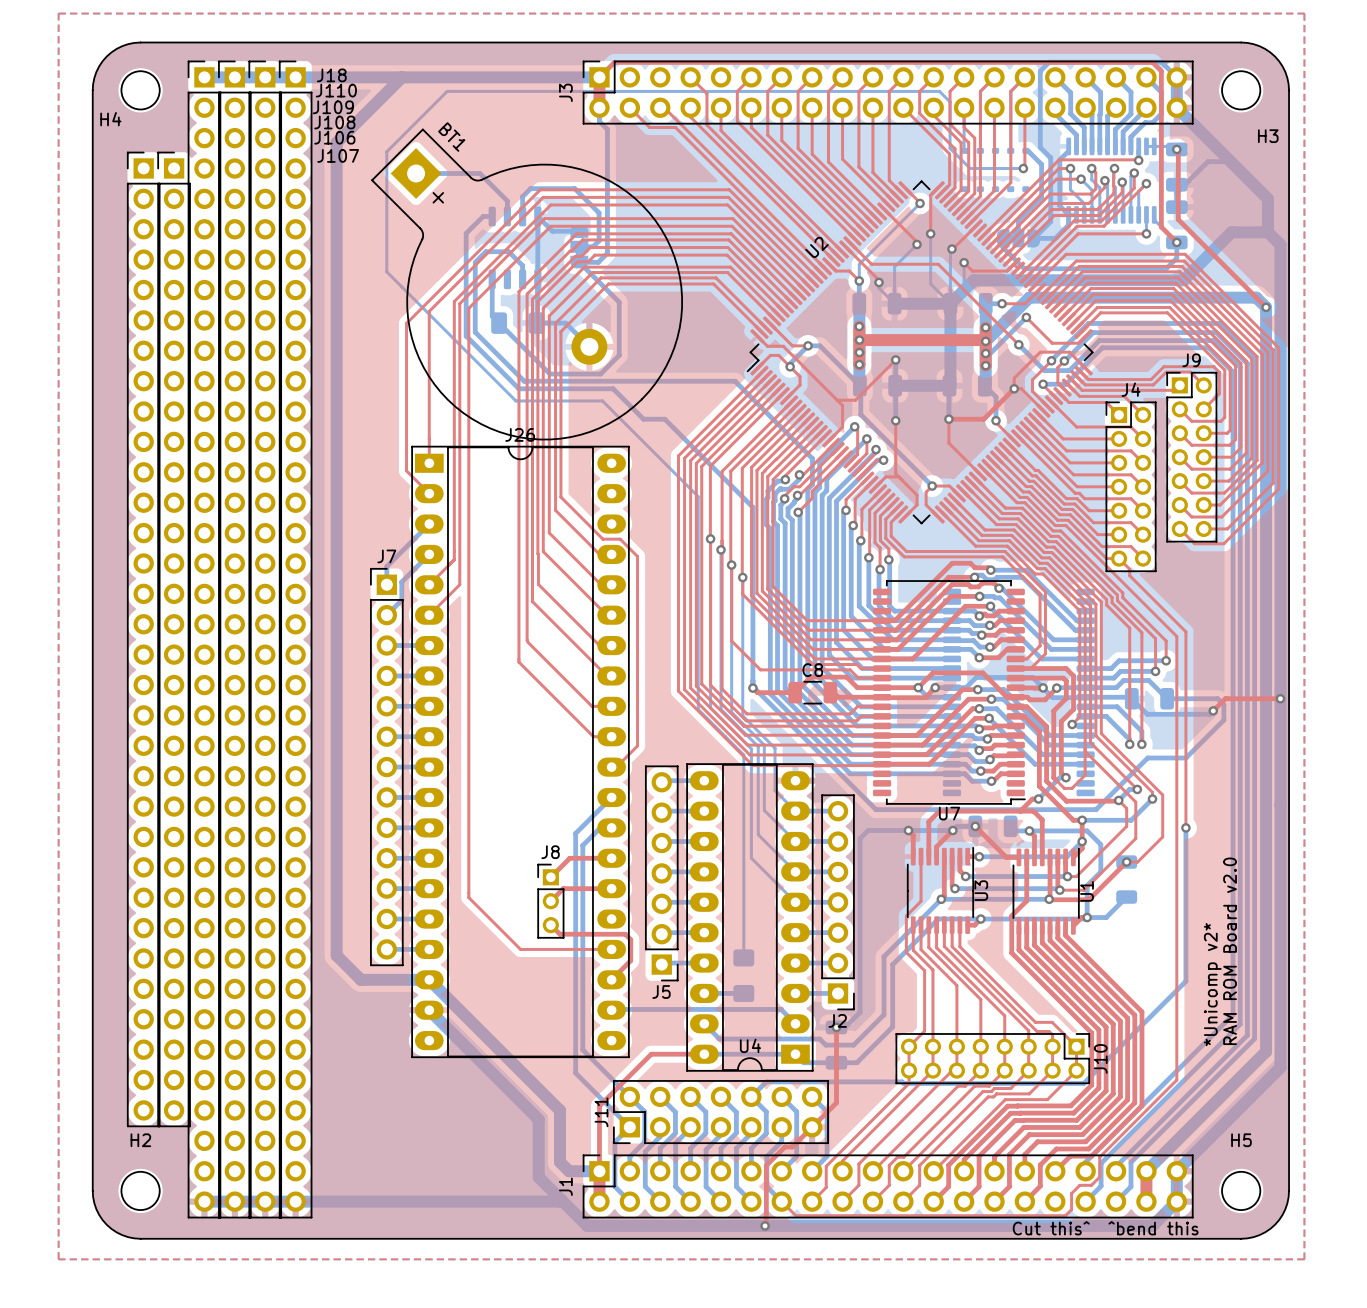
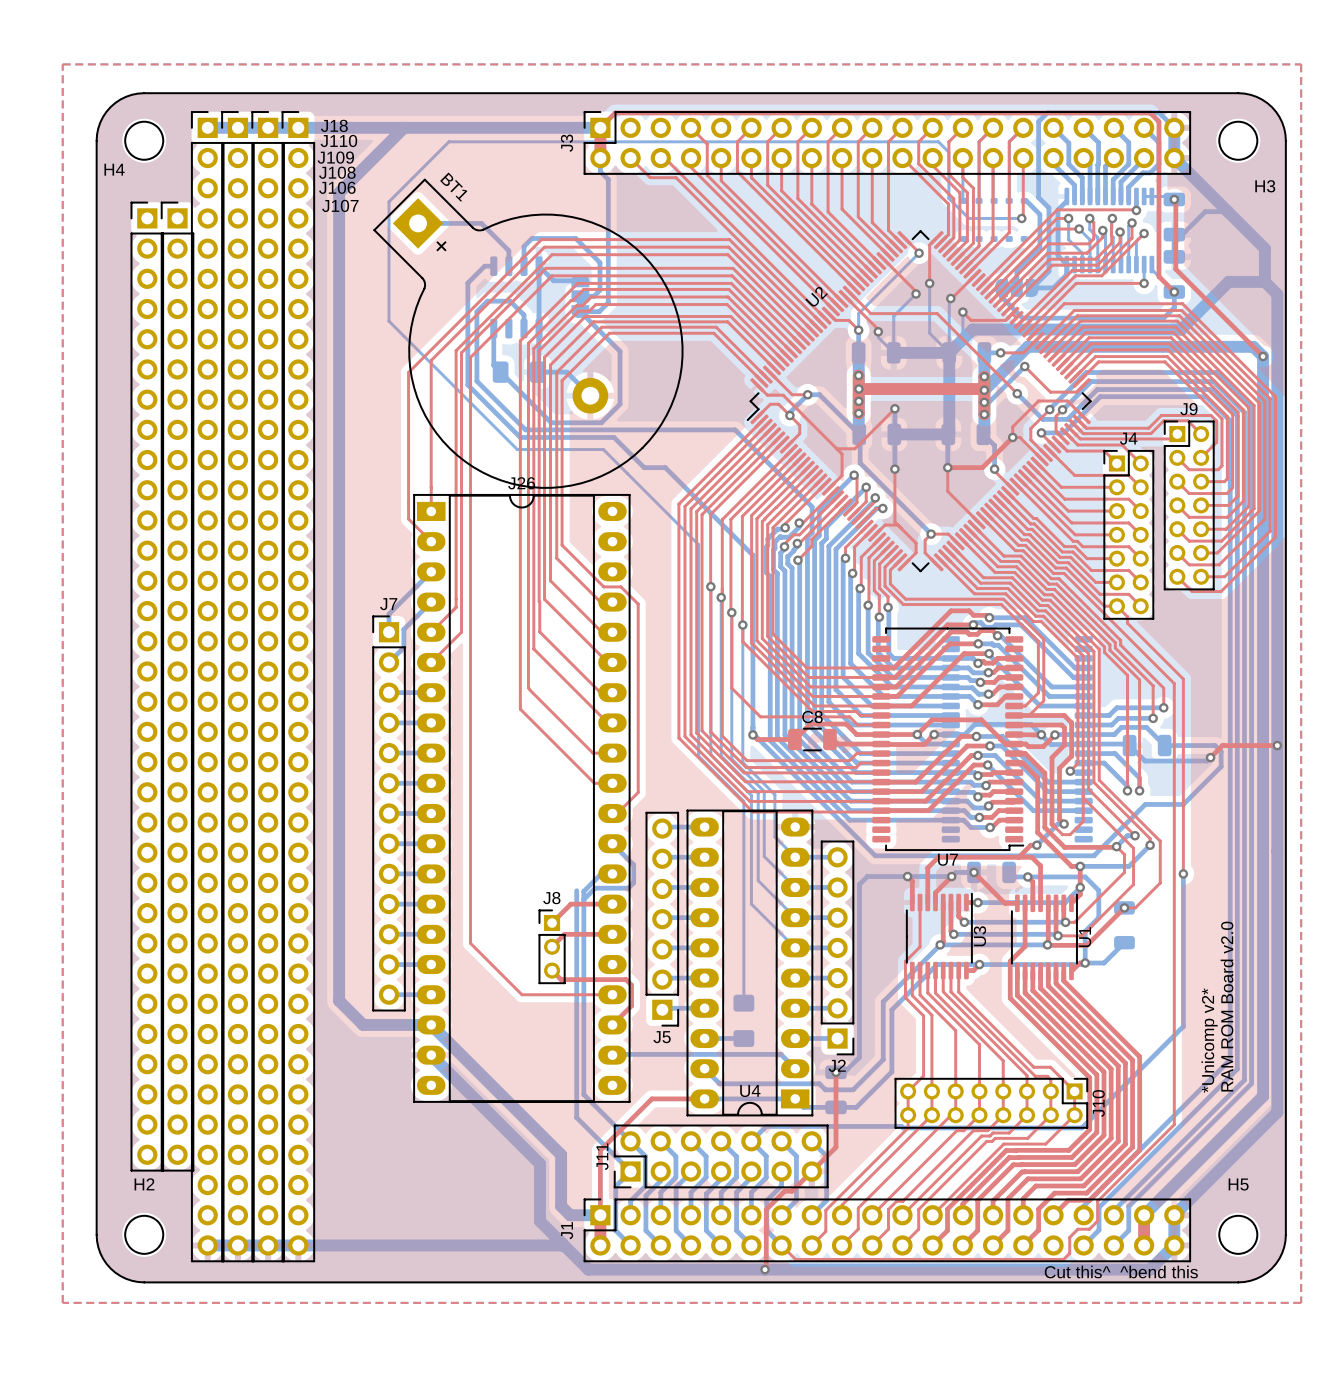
bottom track: (611, 797) (575, 833) (575, 844) -> (612, 843) (633, 864) (633, 882) (628, 888) (595, 888) (583, 899)

